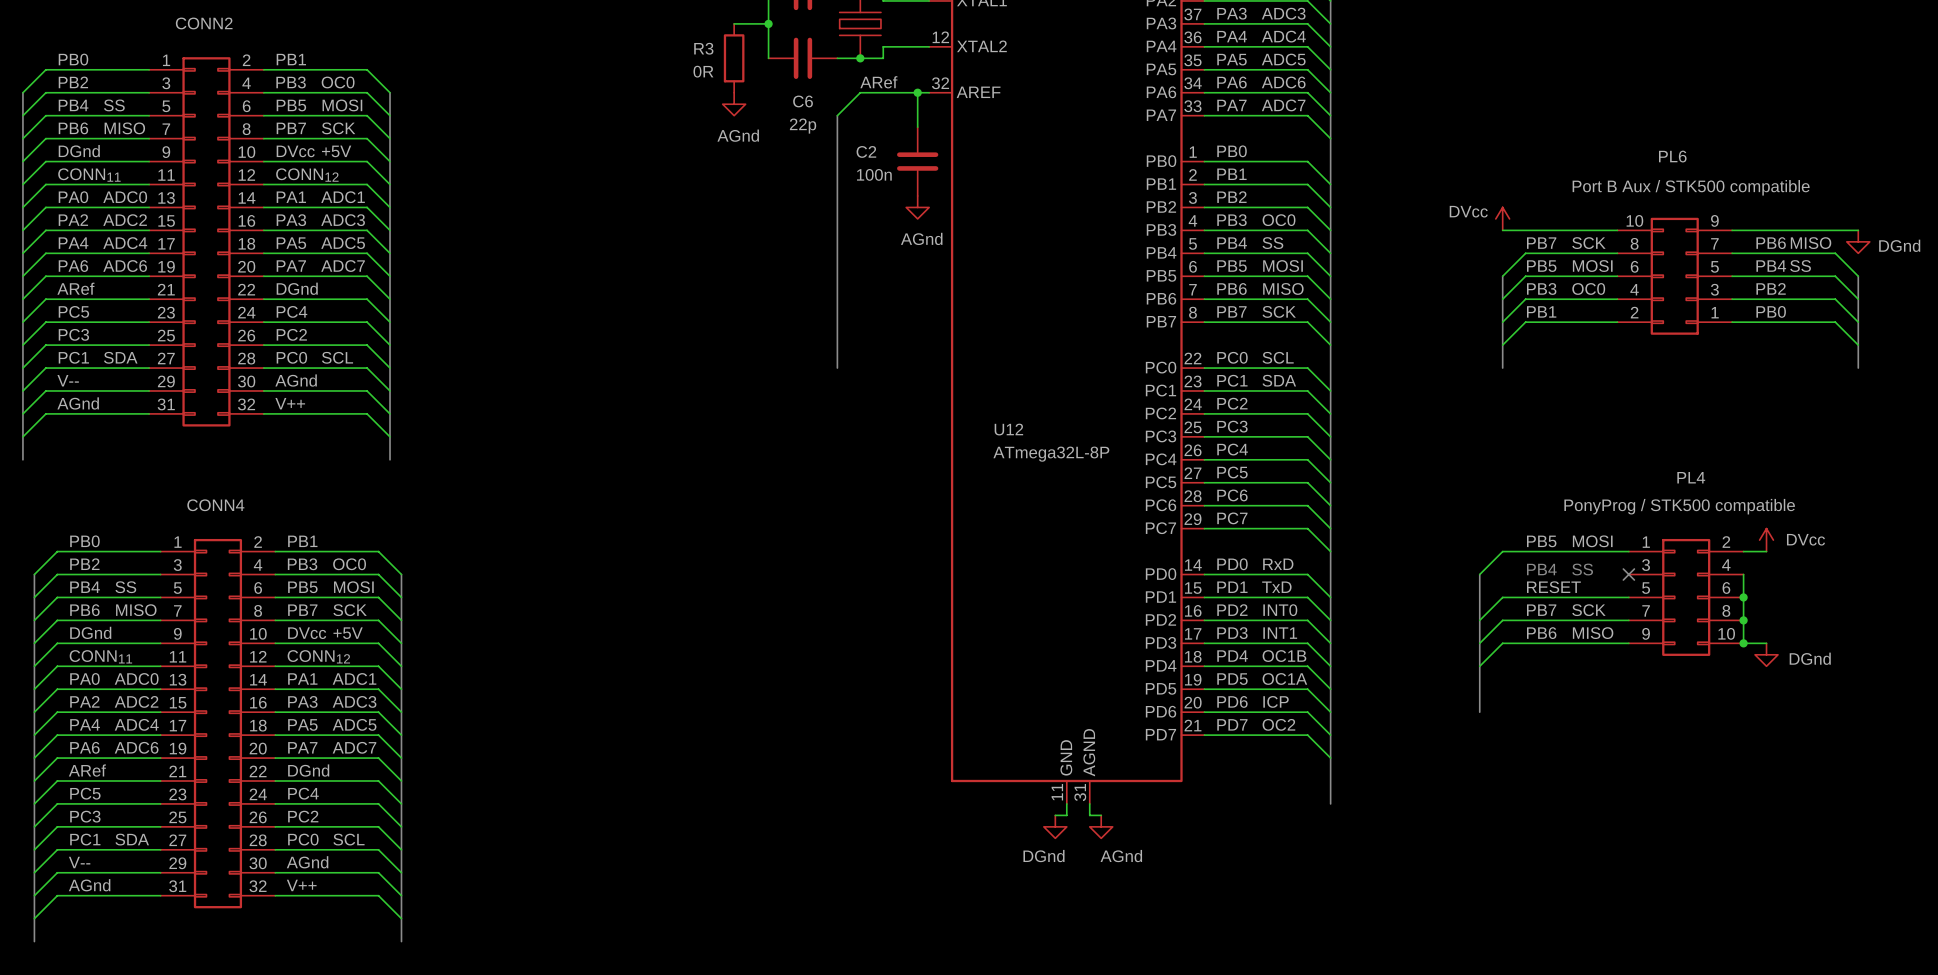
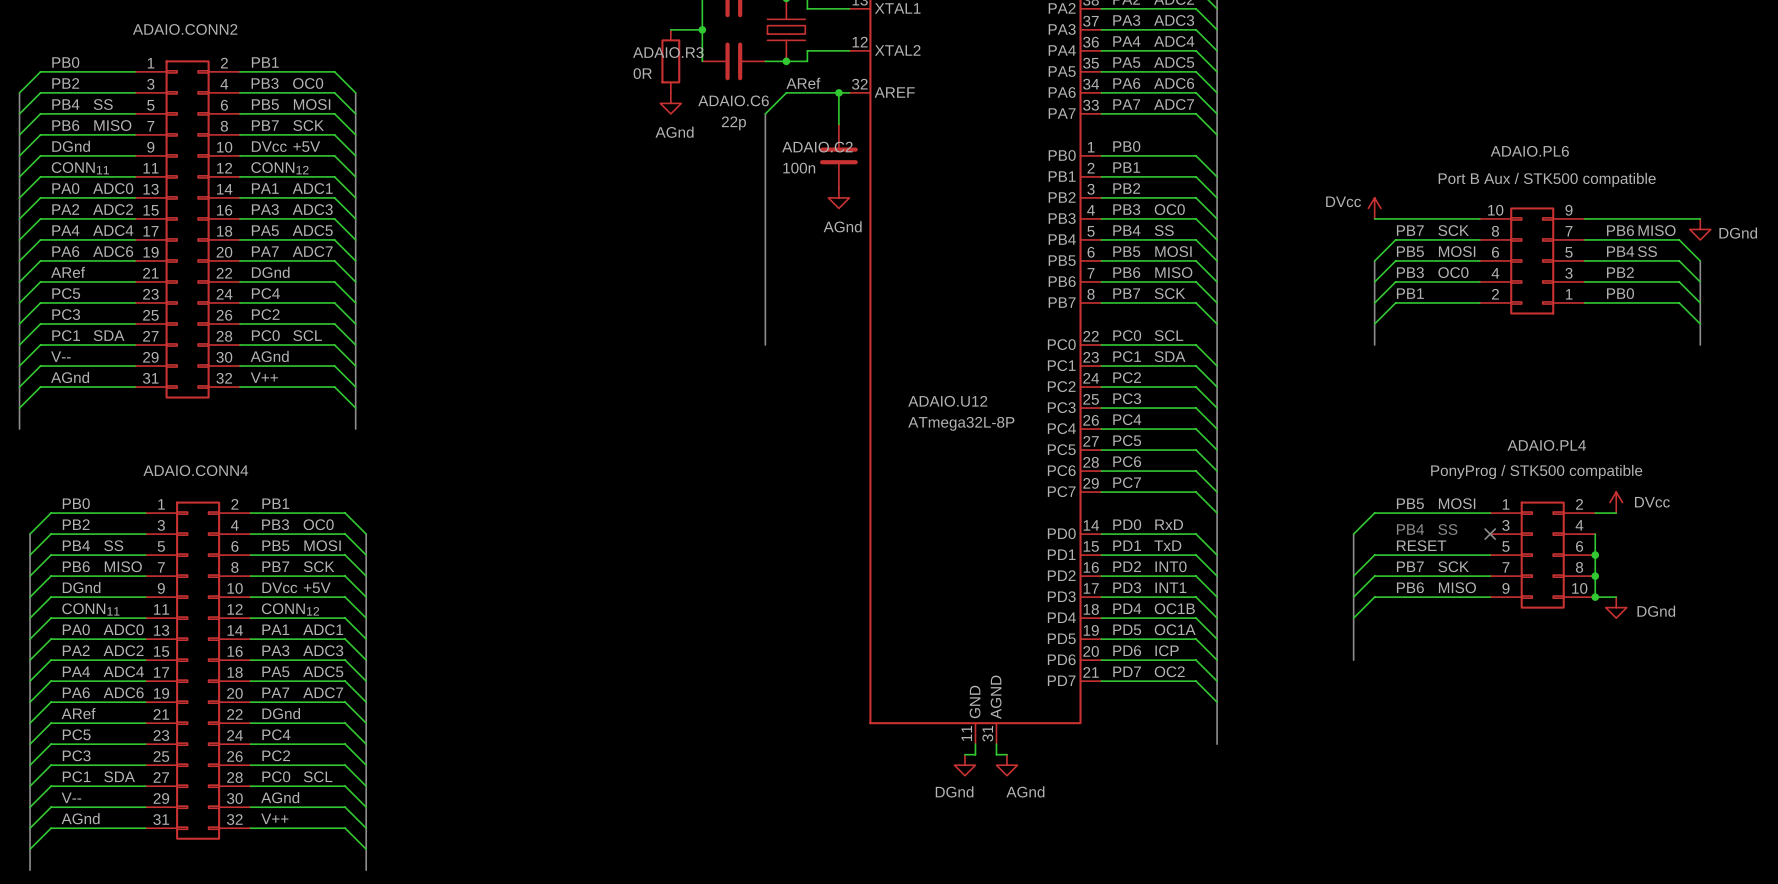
CONN2 name: CONN2 (204, 23) -> ADAIO.CONN2 (185, 29)
R3 name: R3 (703, 48) -> ADAIO.R3 (668, 52)
C6 name: C6 (803, 101) -> ADAIO.C6 (733, 100)
C2 name: C2 (866, 151) -> ADAIO.C2 (817, 147)
PL6 name: PL6 (1672, 156) -> ADAIO.PL6 (1529, 151)
U12 name: U12 (1008, 429) -> ADAIO.U12 (947, 401)
PL4 name: PL4 (1691, 477) -> ADAIO.PL4 (1546, 445)
CONN4 name: CONN4 (215, 505) -> ADAIO.CONN4 (195, 470)

